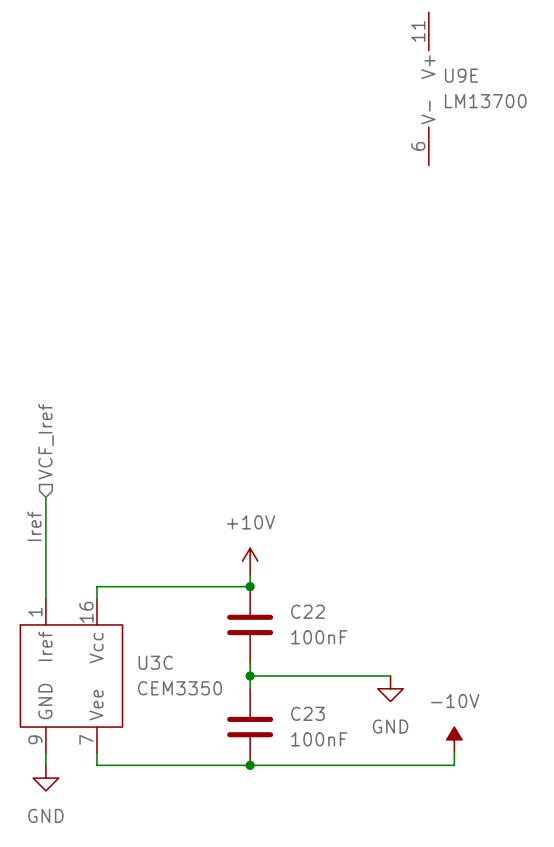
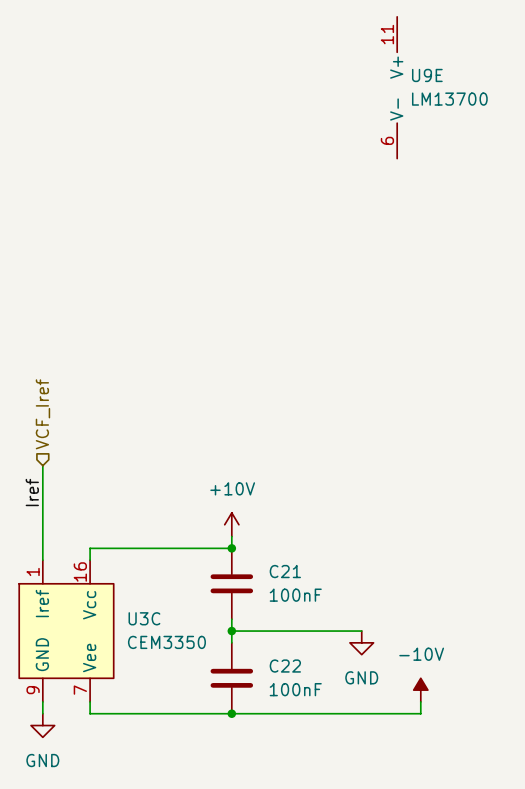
C22 name: C22 (307, 611) -> C21 (285, 571)
C23 name: C23 (307, 713) -> C22 (285, 666)

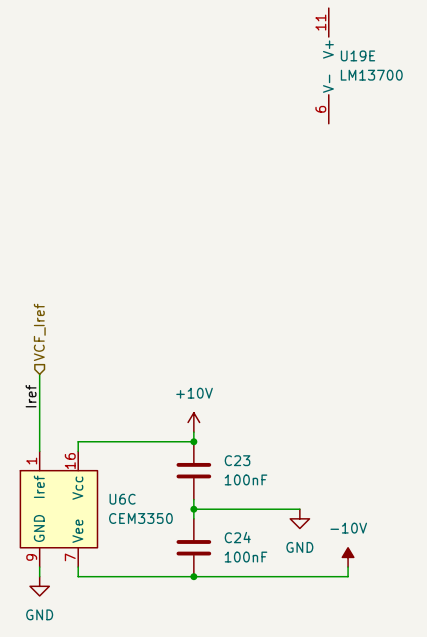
U9E name: U9E (427, 75) -> U19E (357, 55)
C21 name: C21 (285, 571) -> C23 (237, 460)
U3C name: U3C (144, 618) -> U6C (122, 499)
C22 name: C22 (285, 666) -> C24 (237, 537)

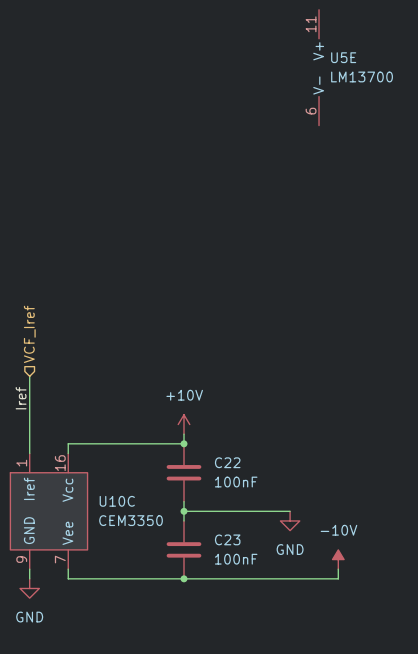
U19E name: U19E (357, 55) -> U5E (343, 57)
C23 name: C23 (237, 460) -> C22 (227, 462)
U6C name: U6C (122, 499) -> U10C (117, 501)
C24 name: C24 (237, 537) -> C23 (227, 539)

